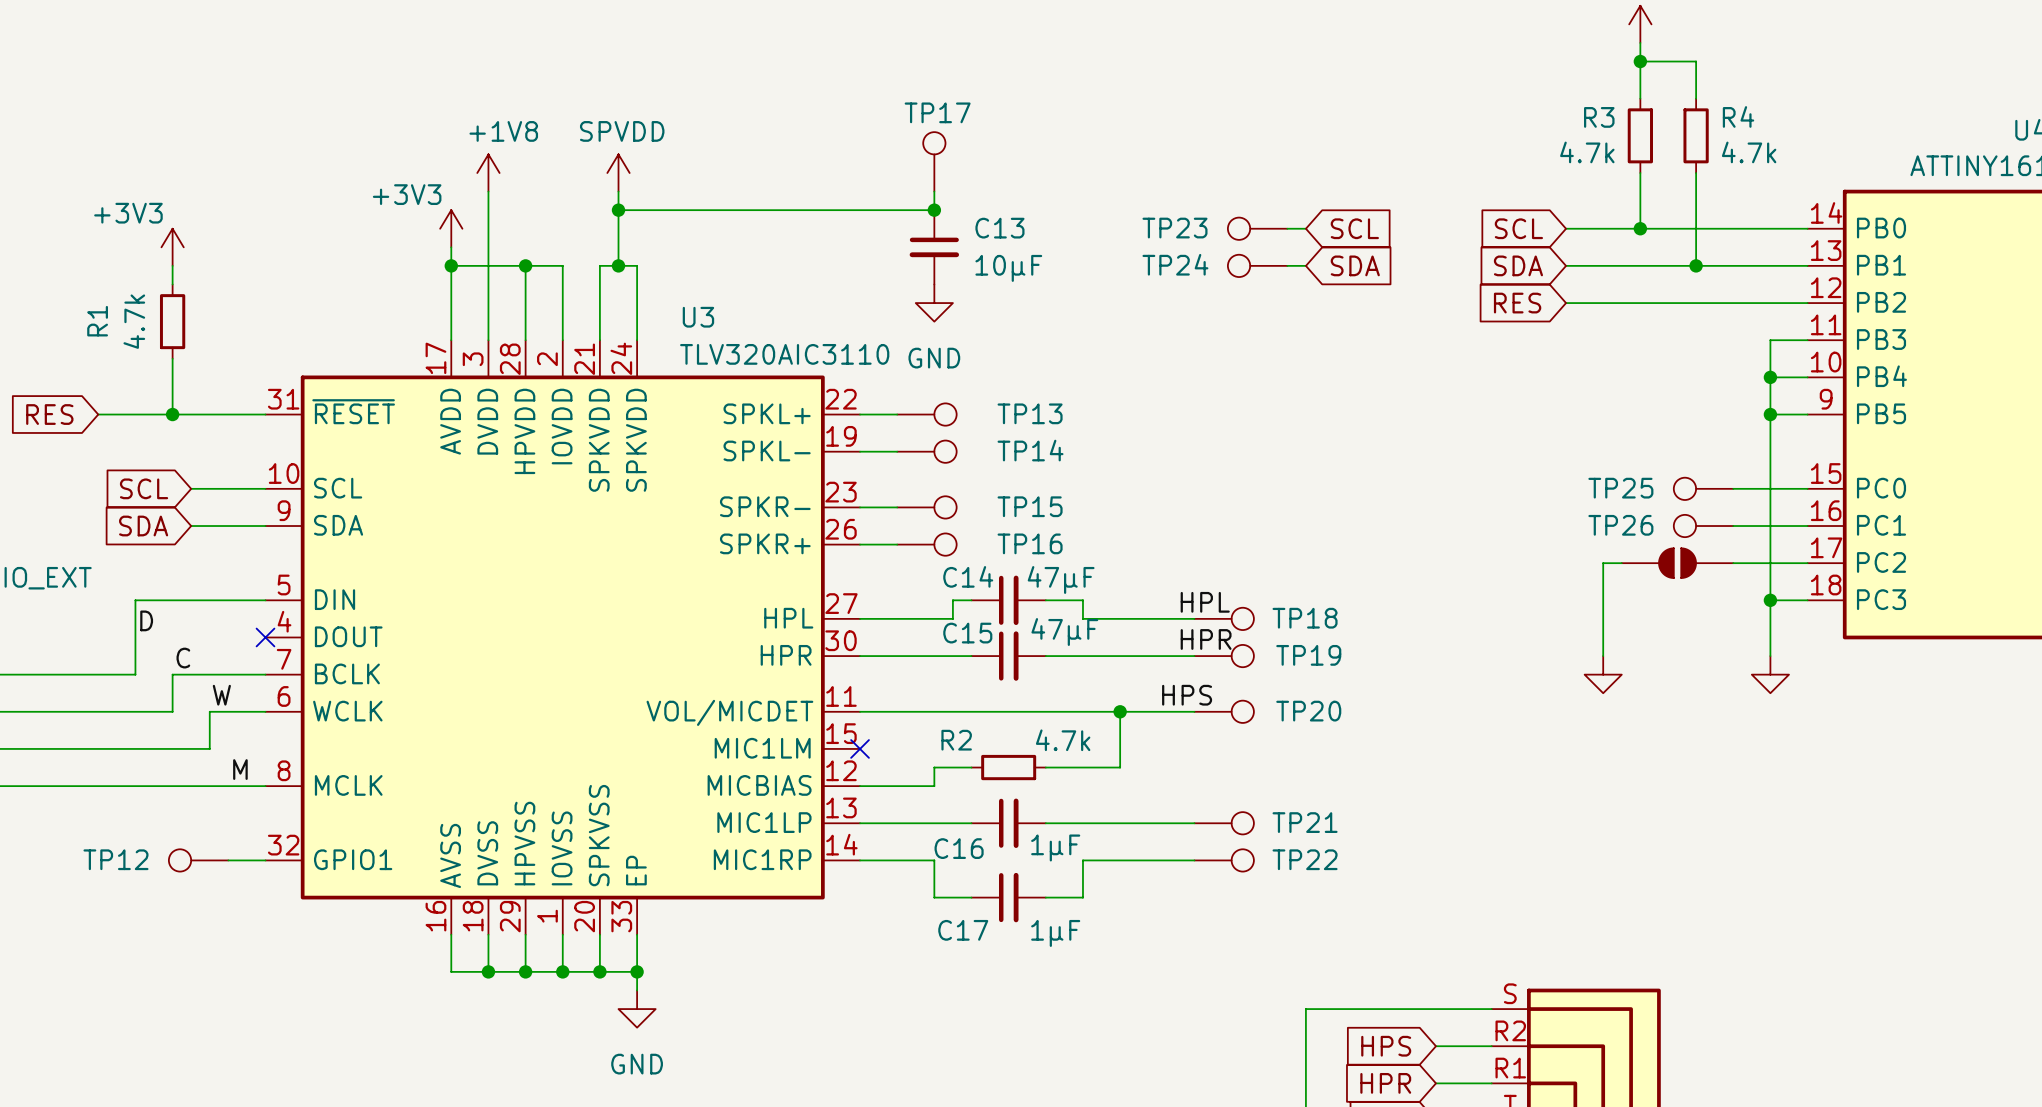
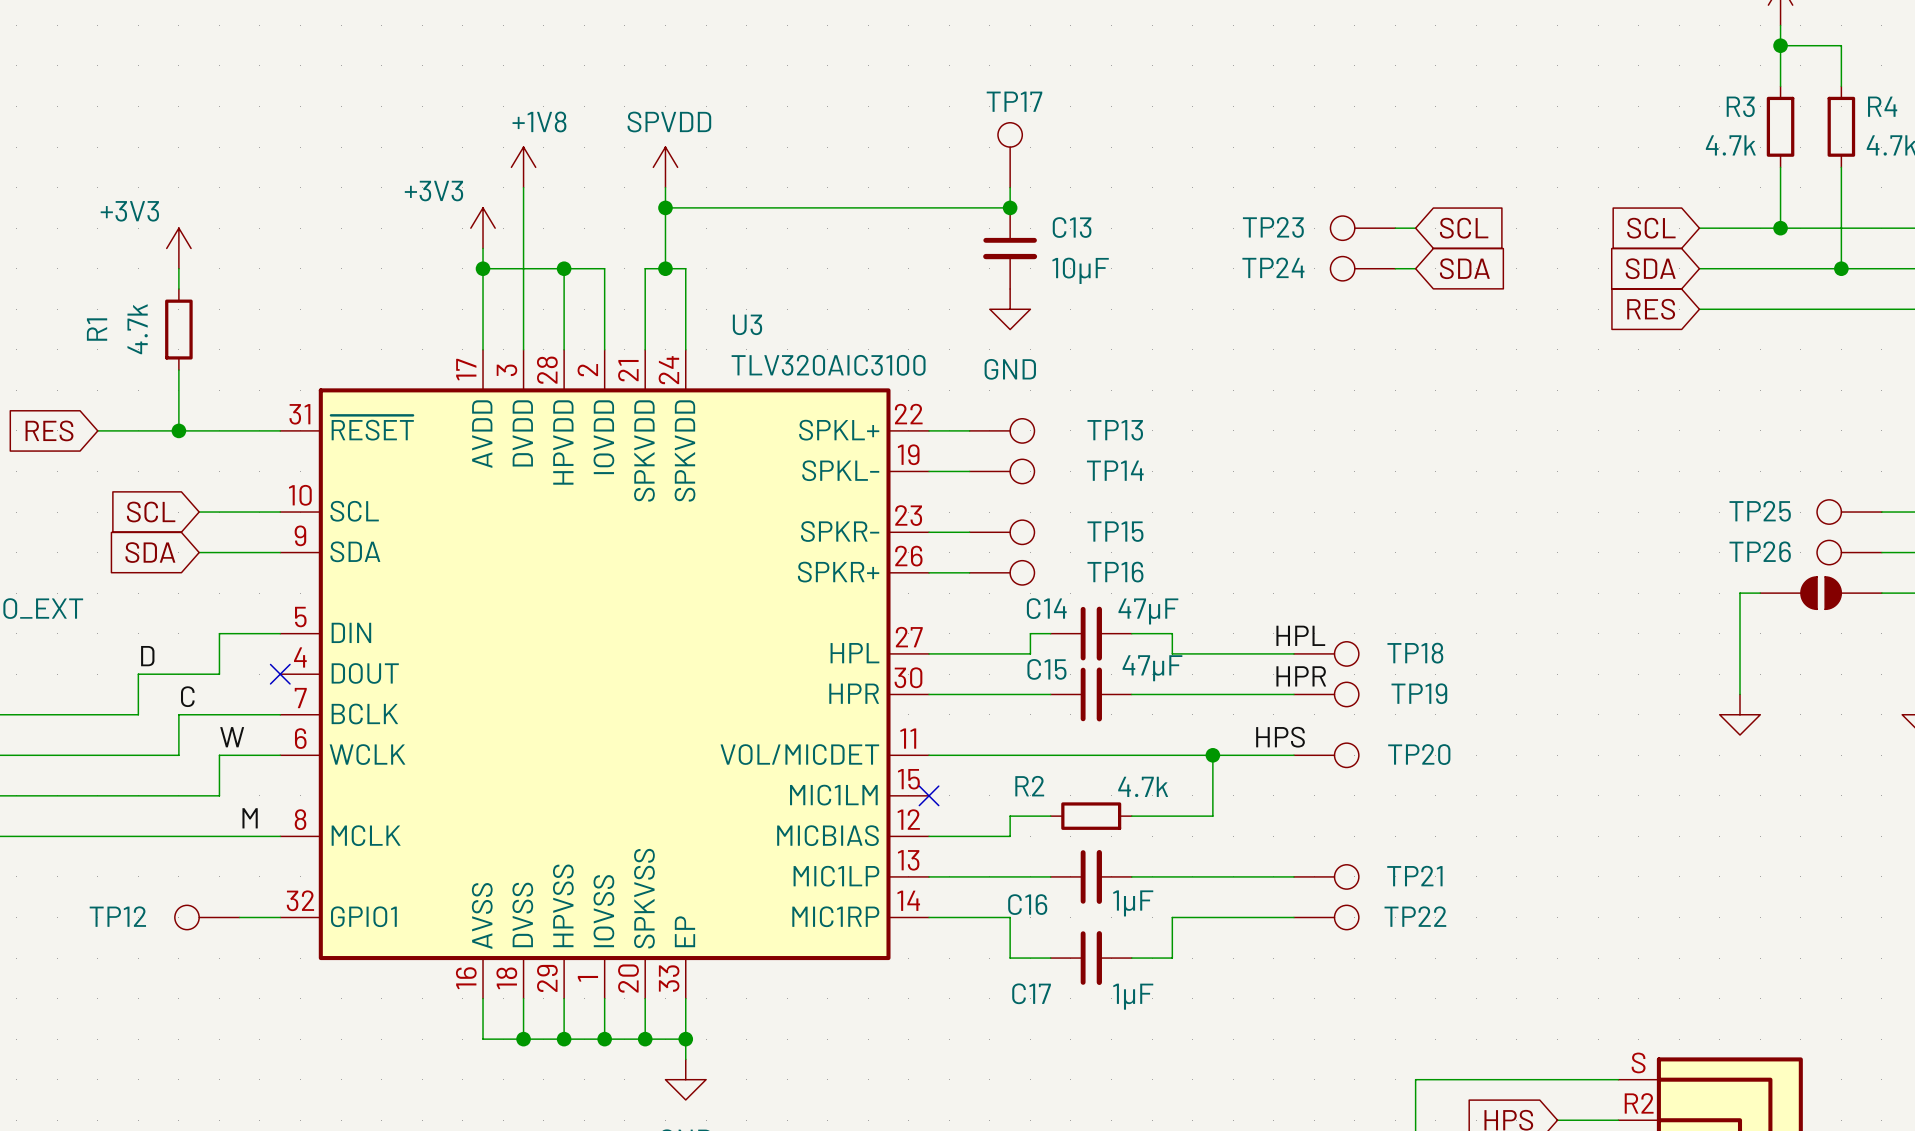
U3 value: TLV320AIC3110 (784, 354) -> TLV320AIC3100 (828, 365)
wire: (209, 600) (135, 600) (135, 637) -> (219, 633) (219, 674) (138, 674)

